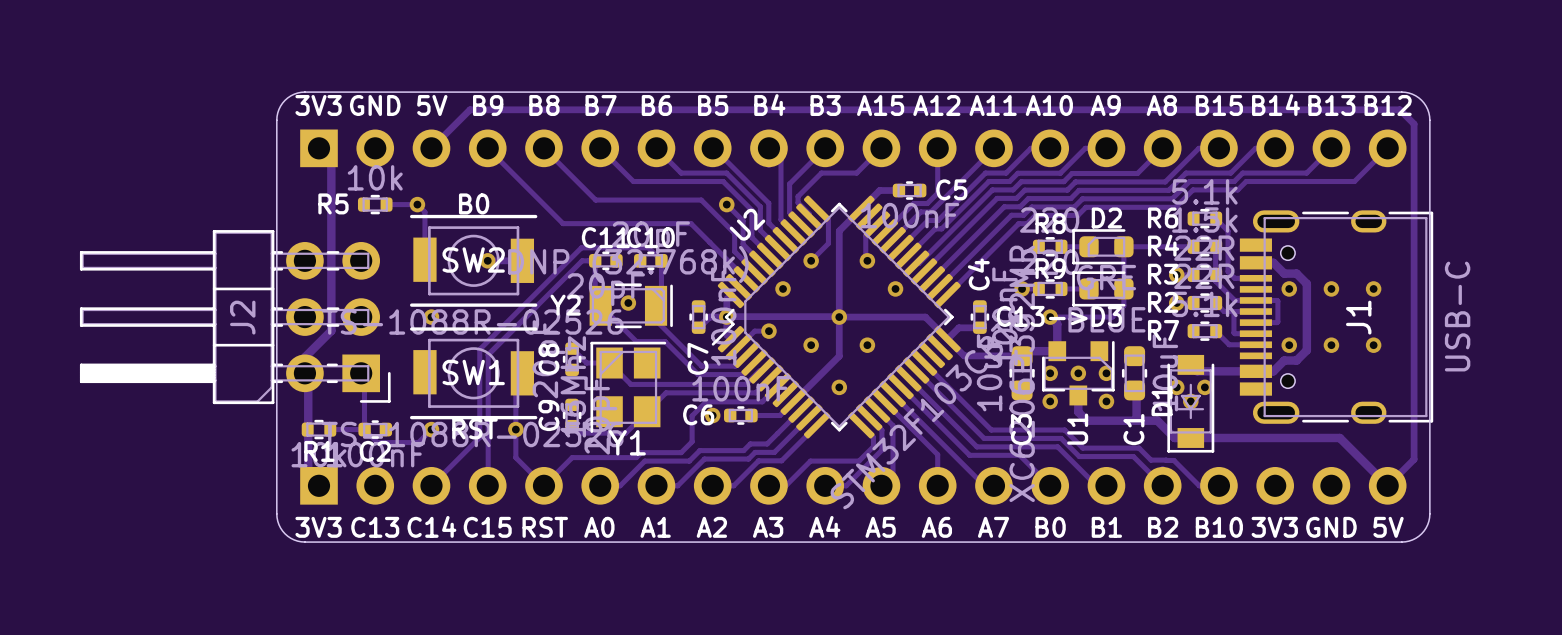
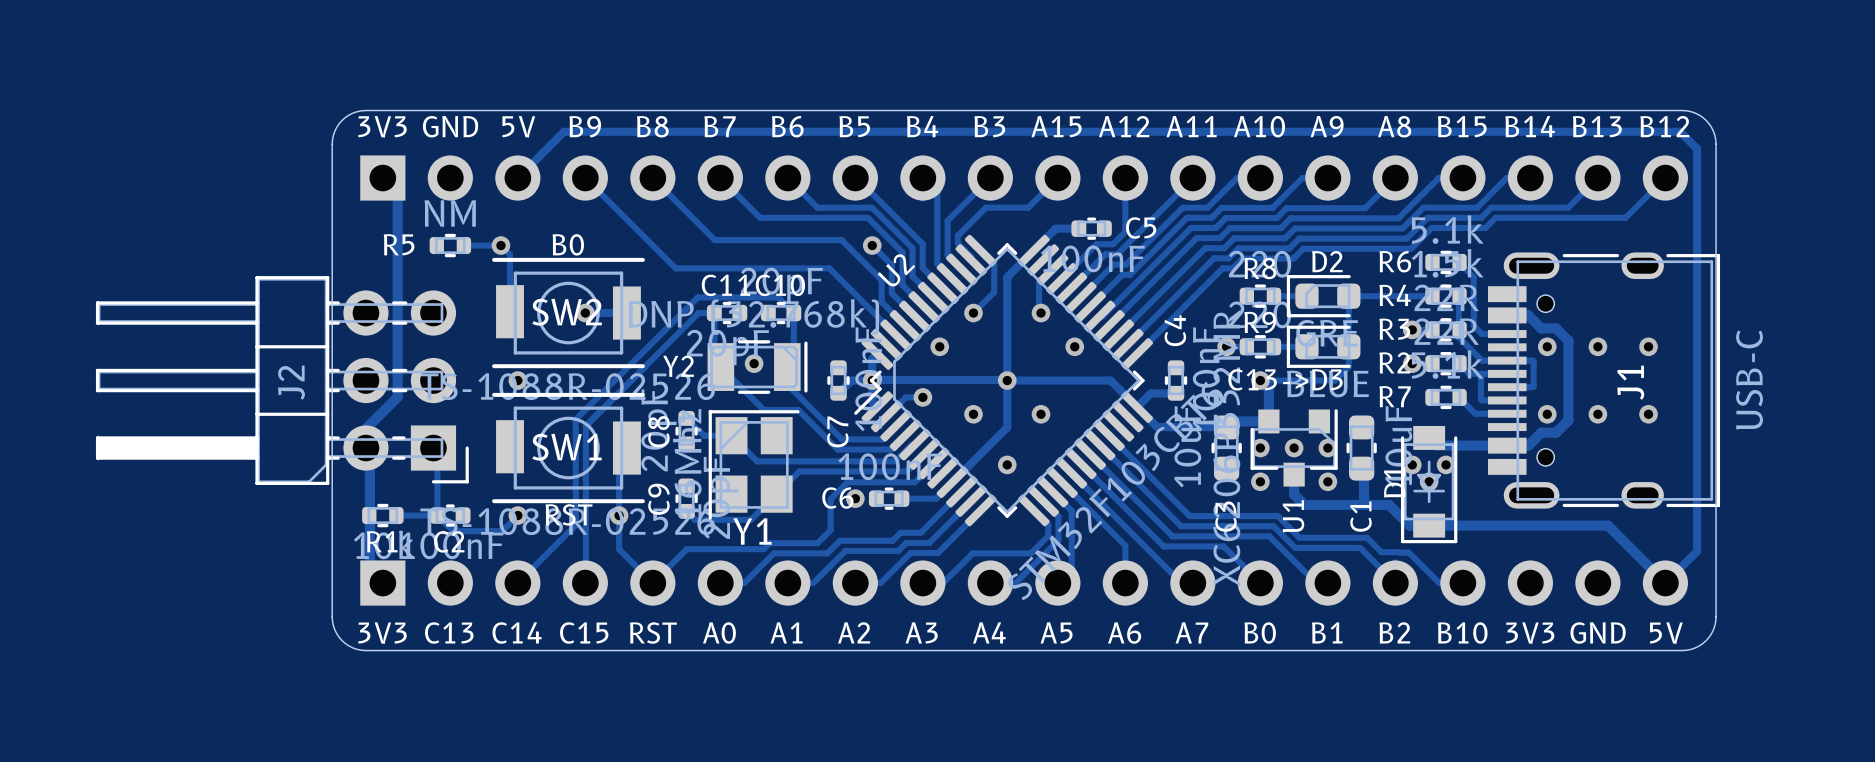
R5 value: 10k (375, 177) -> NM (450, 213)

